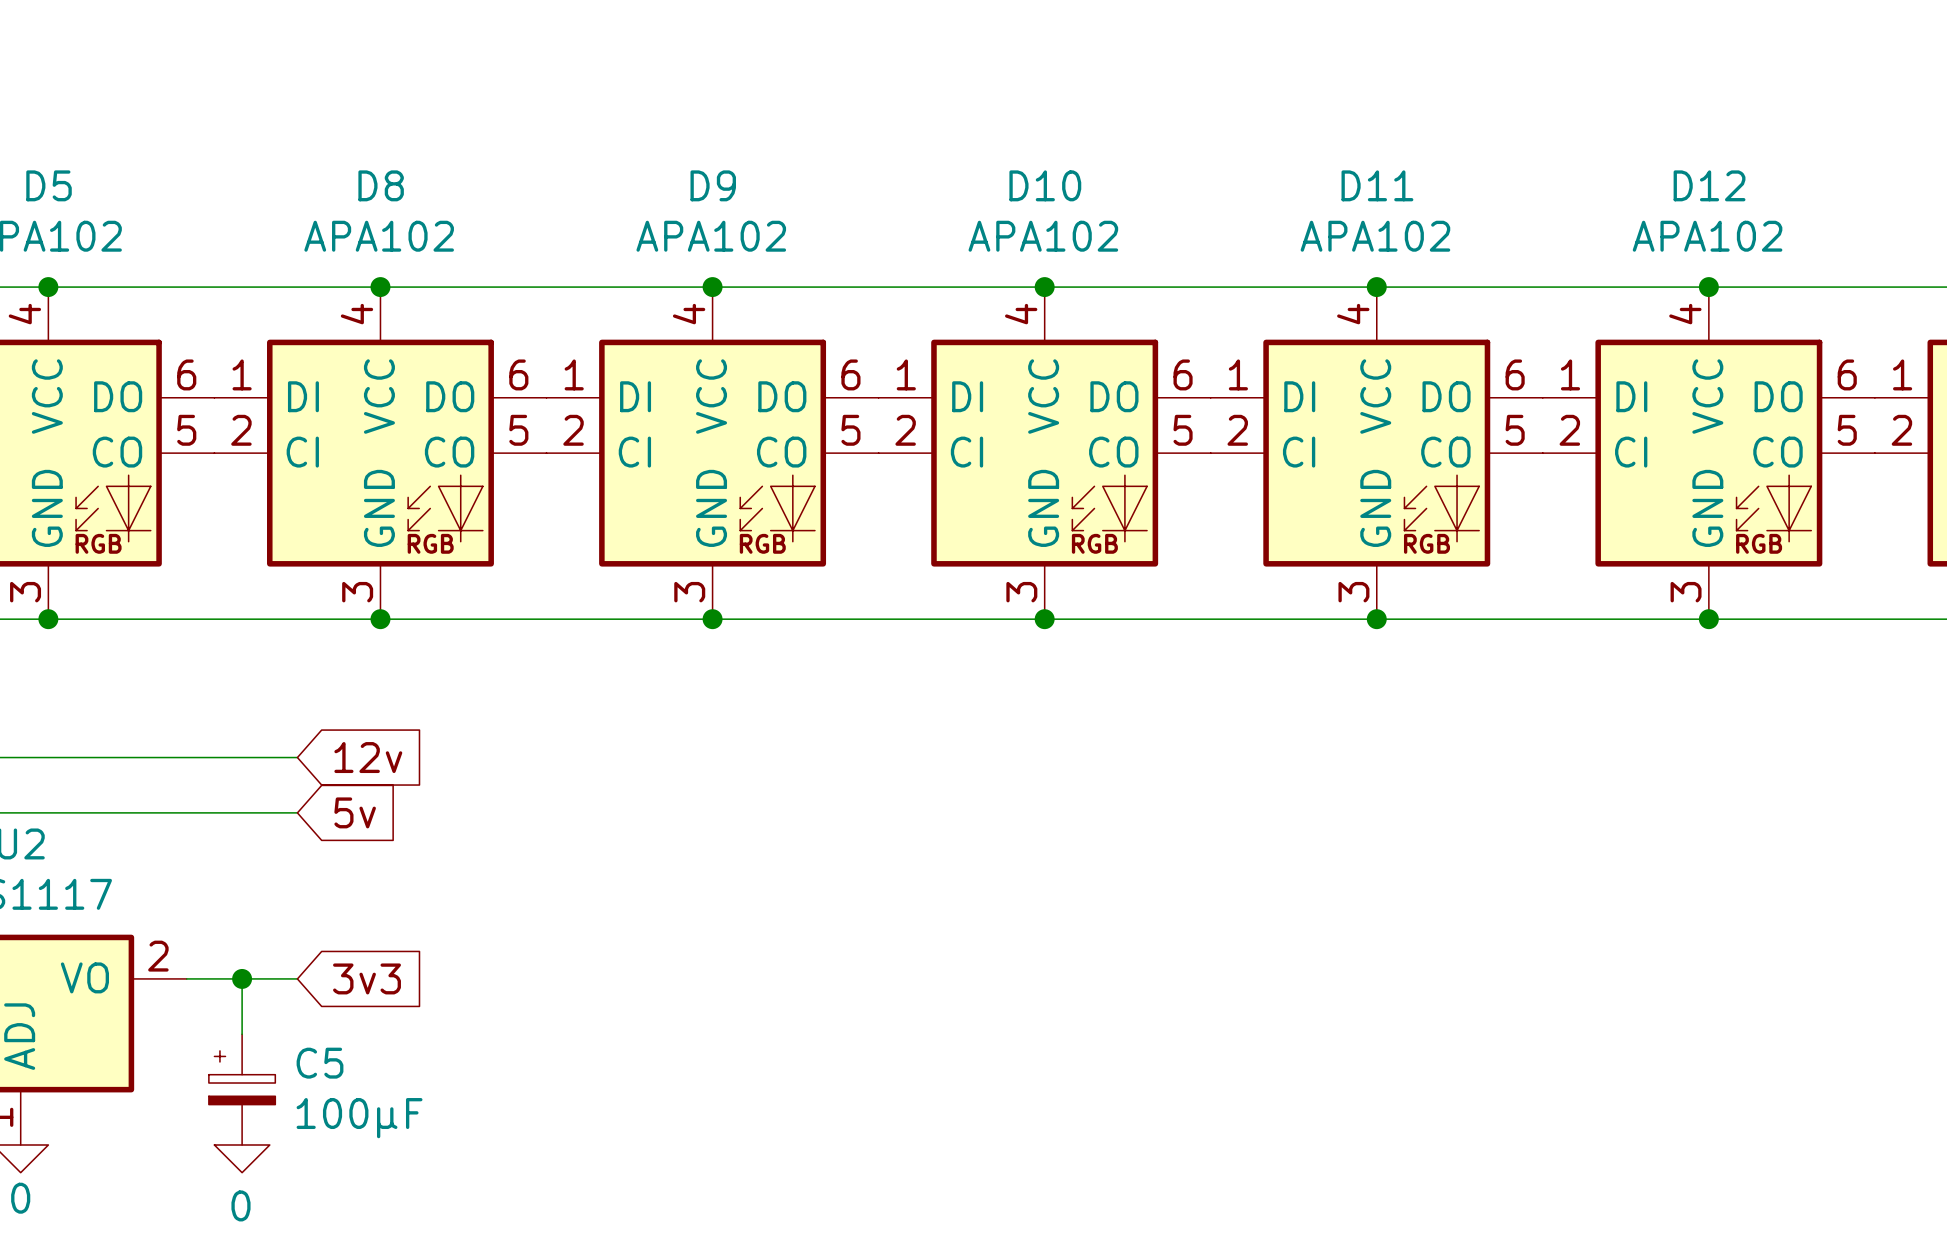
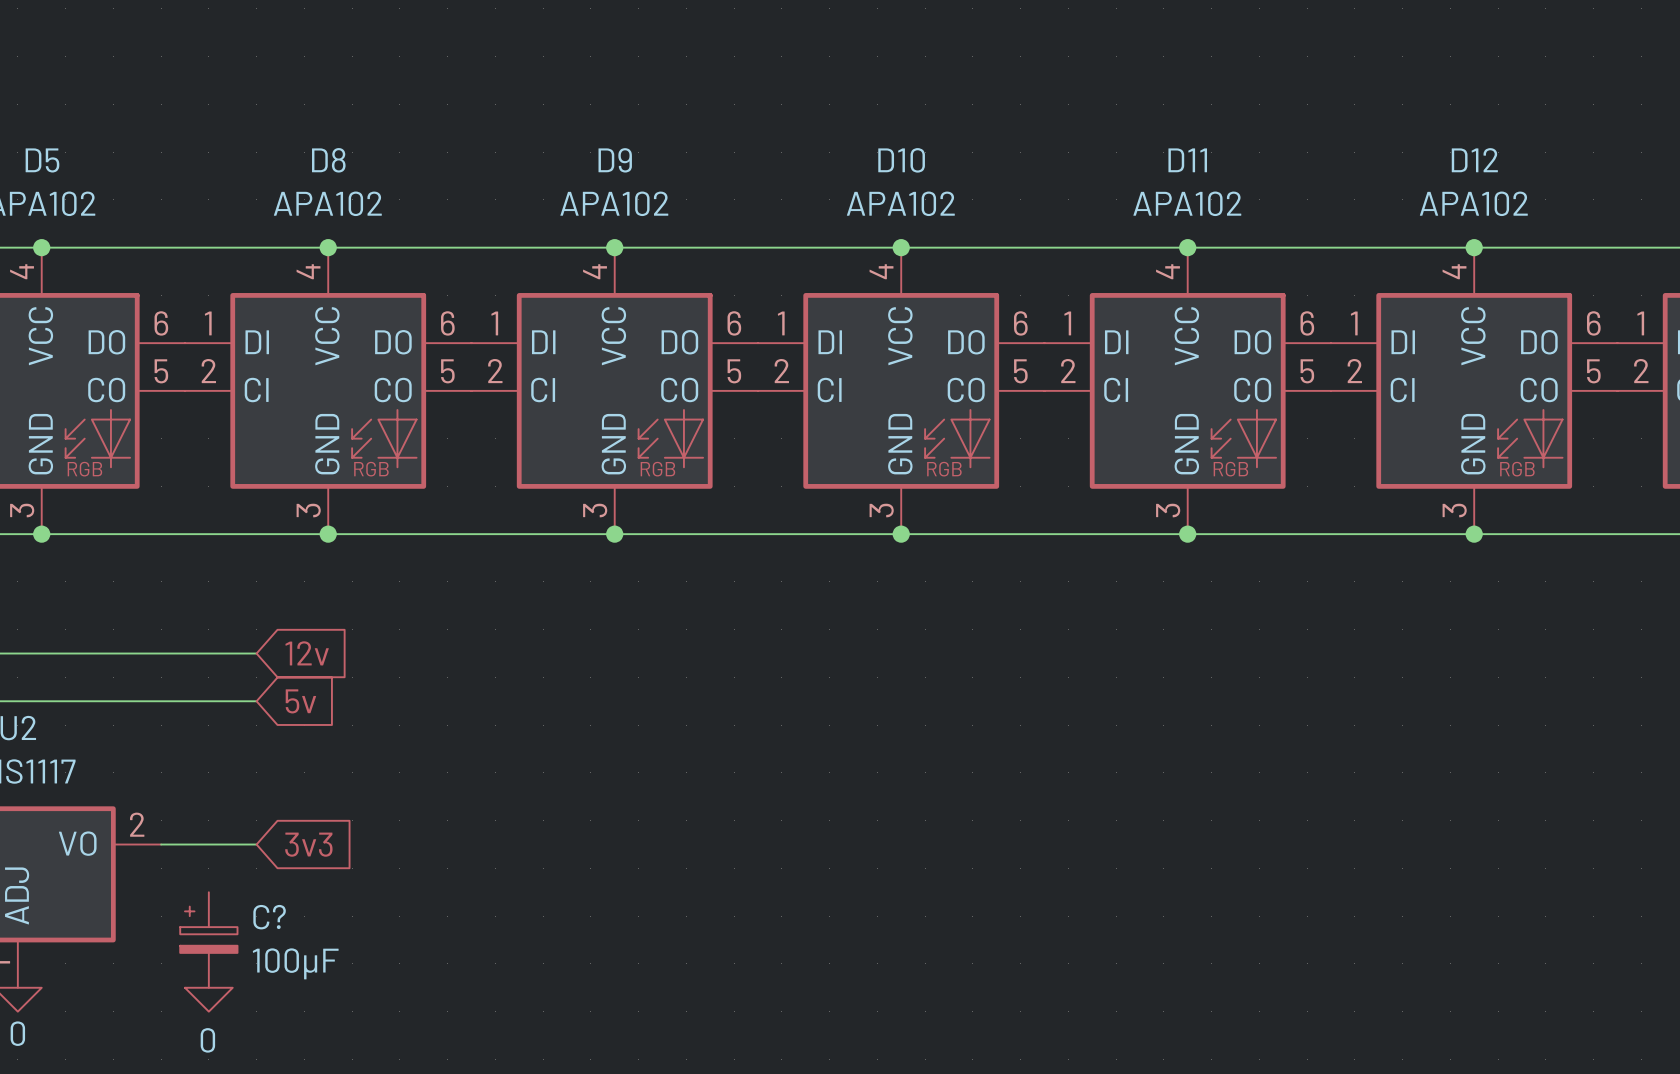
wire: (242, 978) (242, 1034) -> none
junction: (242, 978) -> none
C5 name: C5 (320, 1063) -> C? (269, 917)

